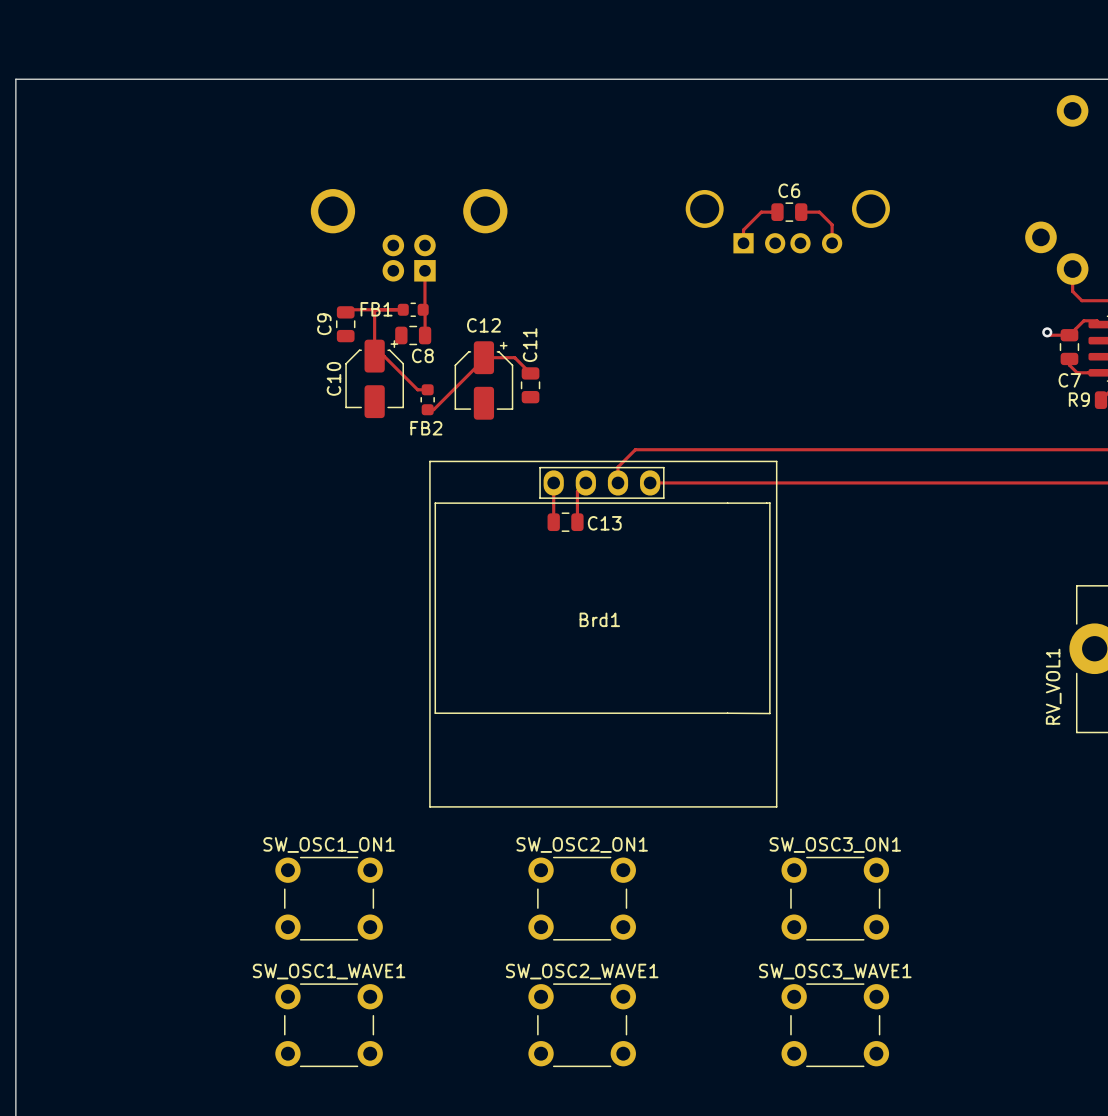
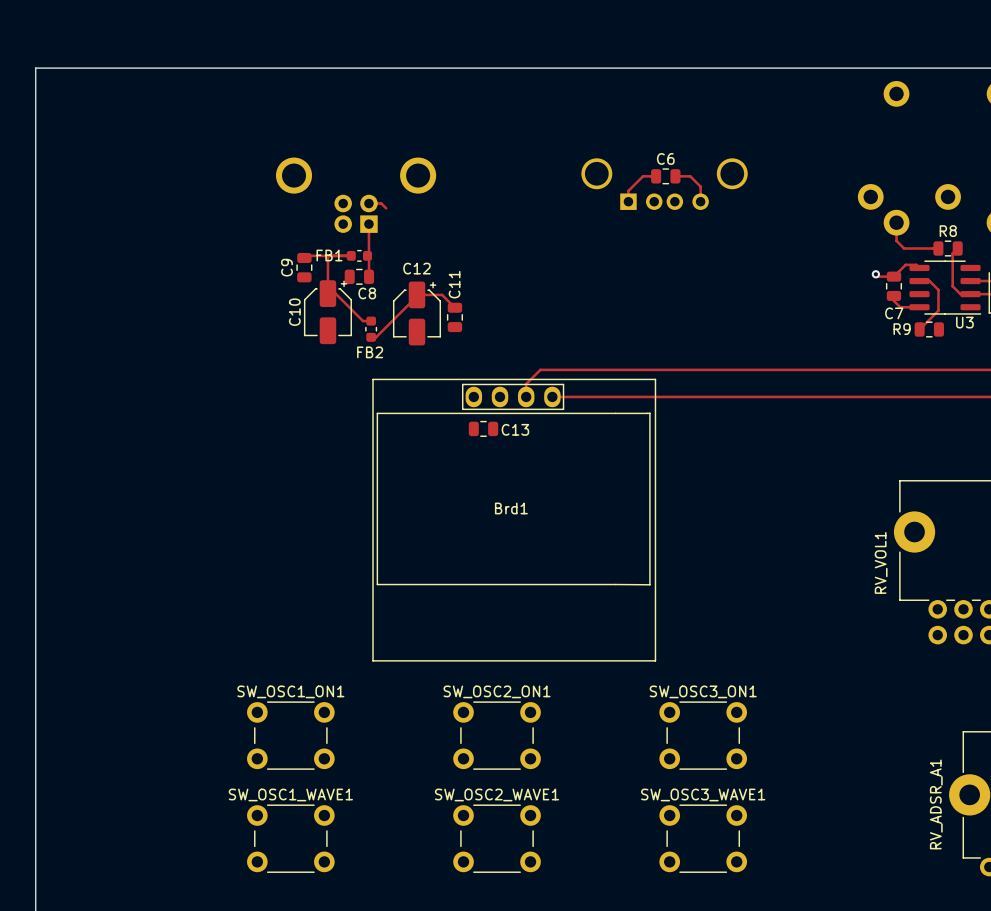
track: none -> (368, 203) (381, 203) (386, 208)
track: (553, 482) (553, 522) -> none
track: (585, 482) (577, 491) (577, 522) -> none

